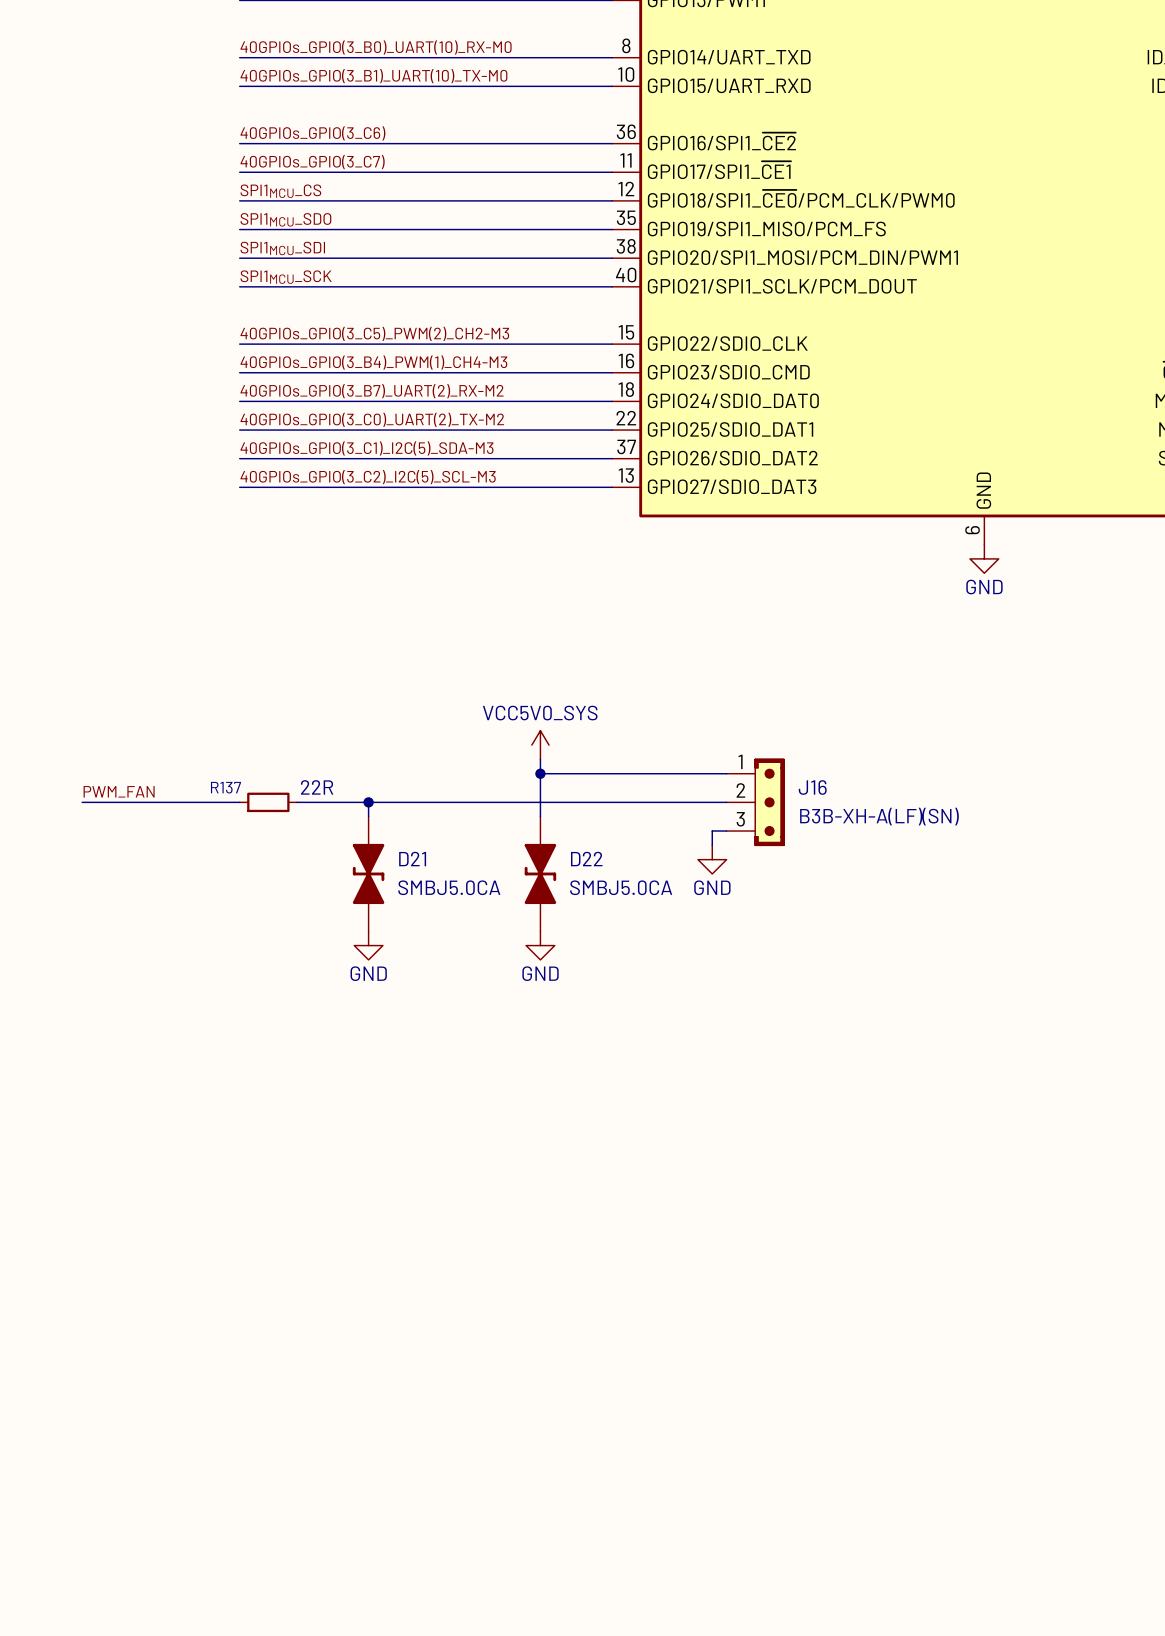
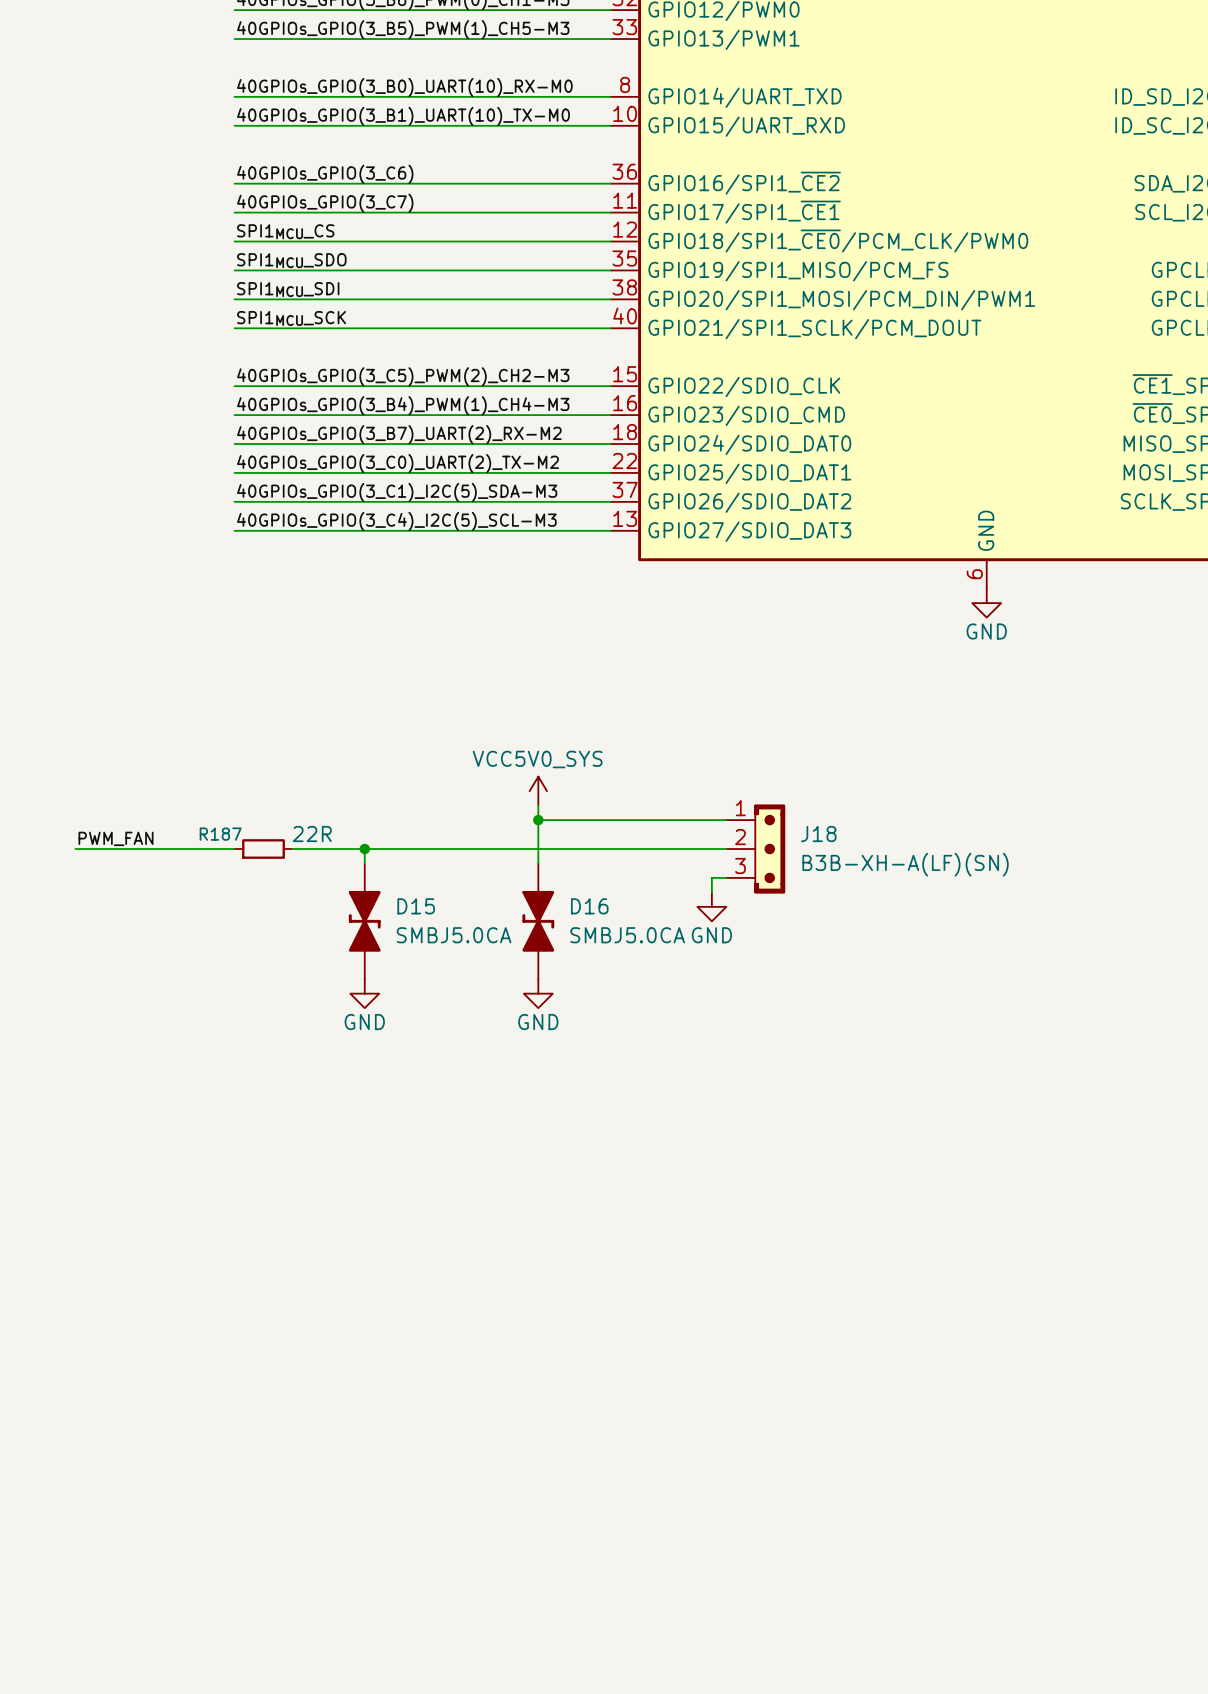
label: 40GPIOs_GPIO(3_C2)_I2C(5)_SCL-M3 (368, 477) -> 40GPIOs_GPIO(3_C4)_I2C(5)_SCL-M3 (396, 521)
R137 name: R137 (225, 787) -> R187 (220, 834)
J16 name: J16 (812, 787) -> J18 (818, 834)
D21 name: D21 (412, 859) -> D15 (416, 906)
D22 name: D22 (586, 859) -> D16 (589, 906)

